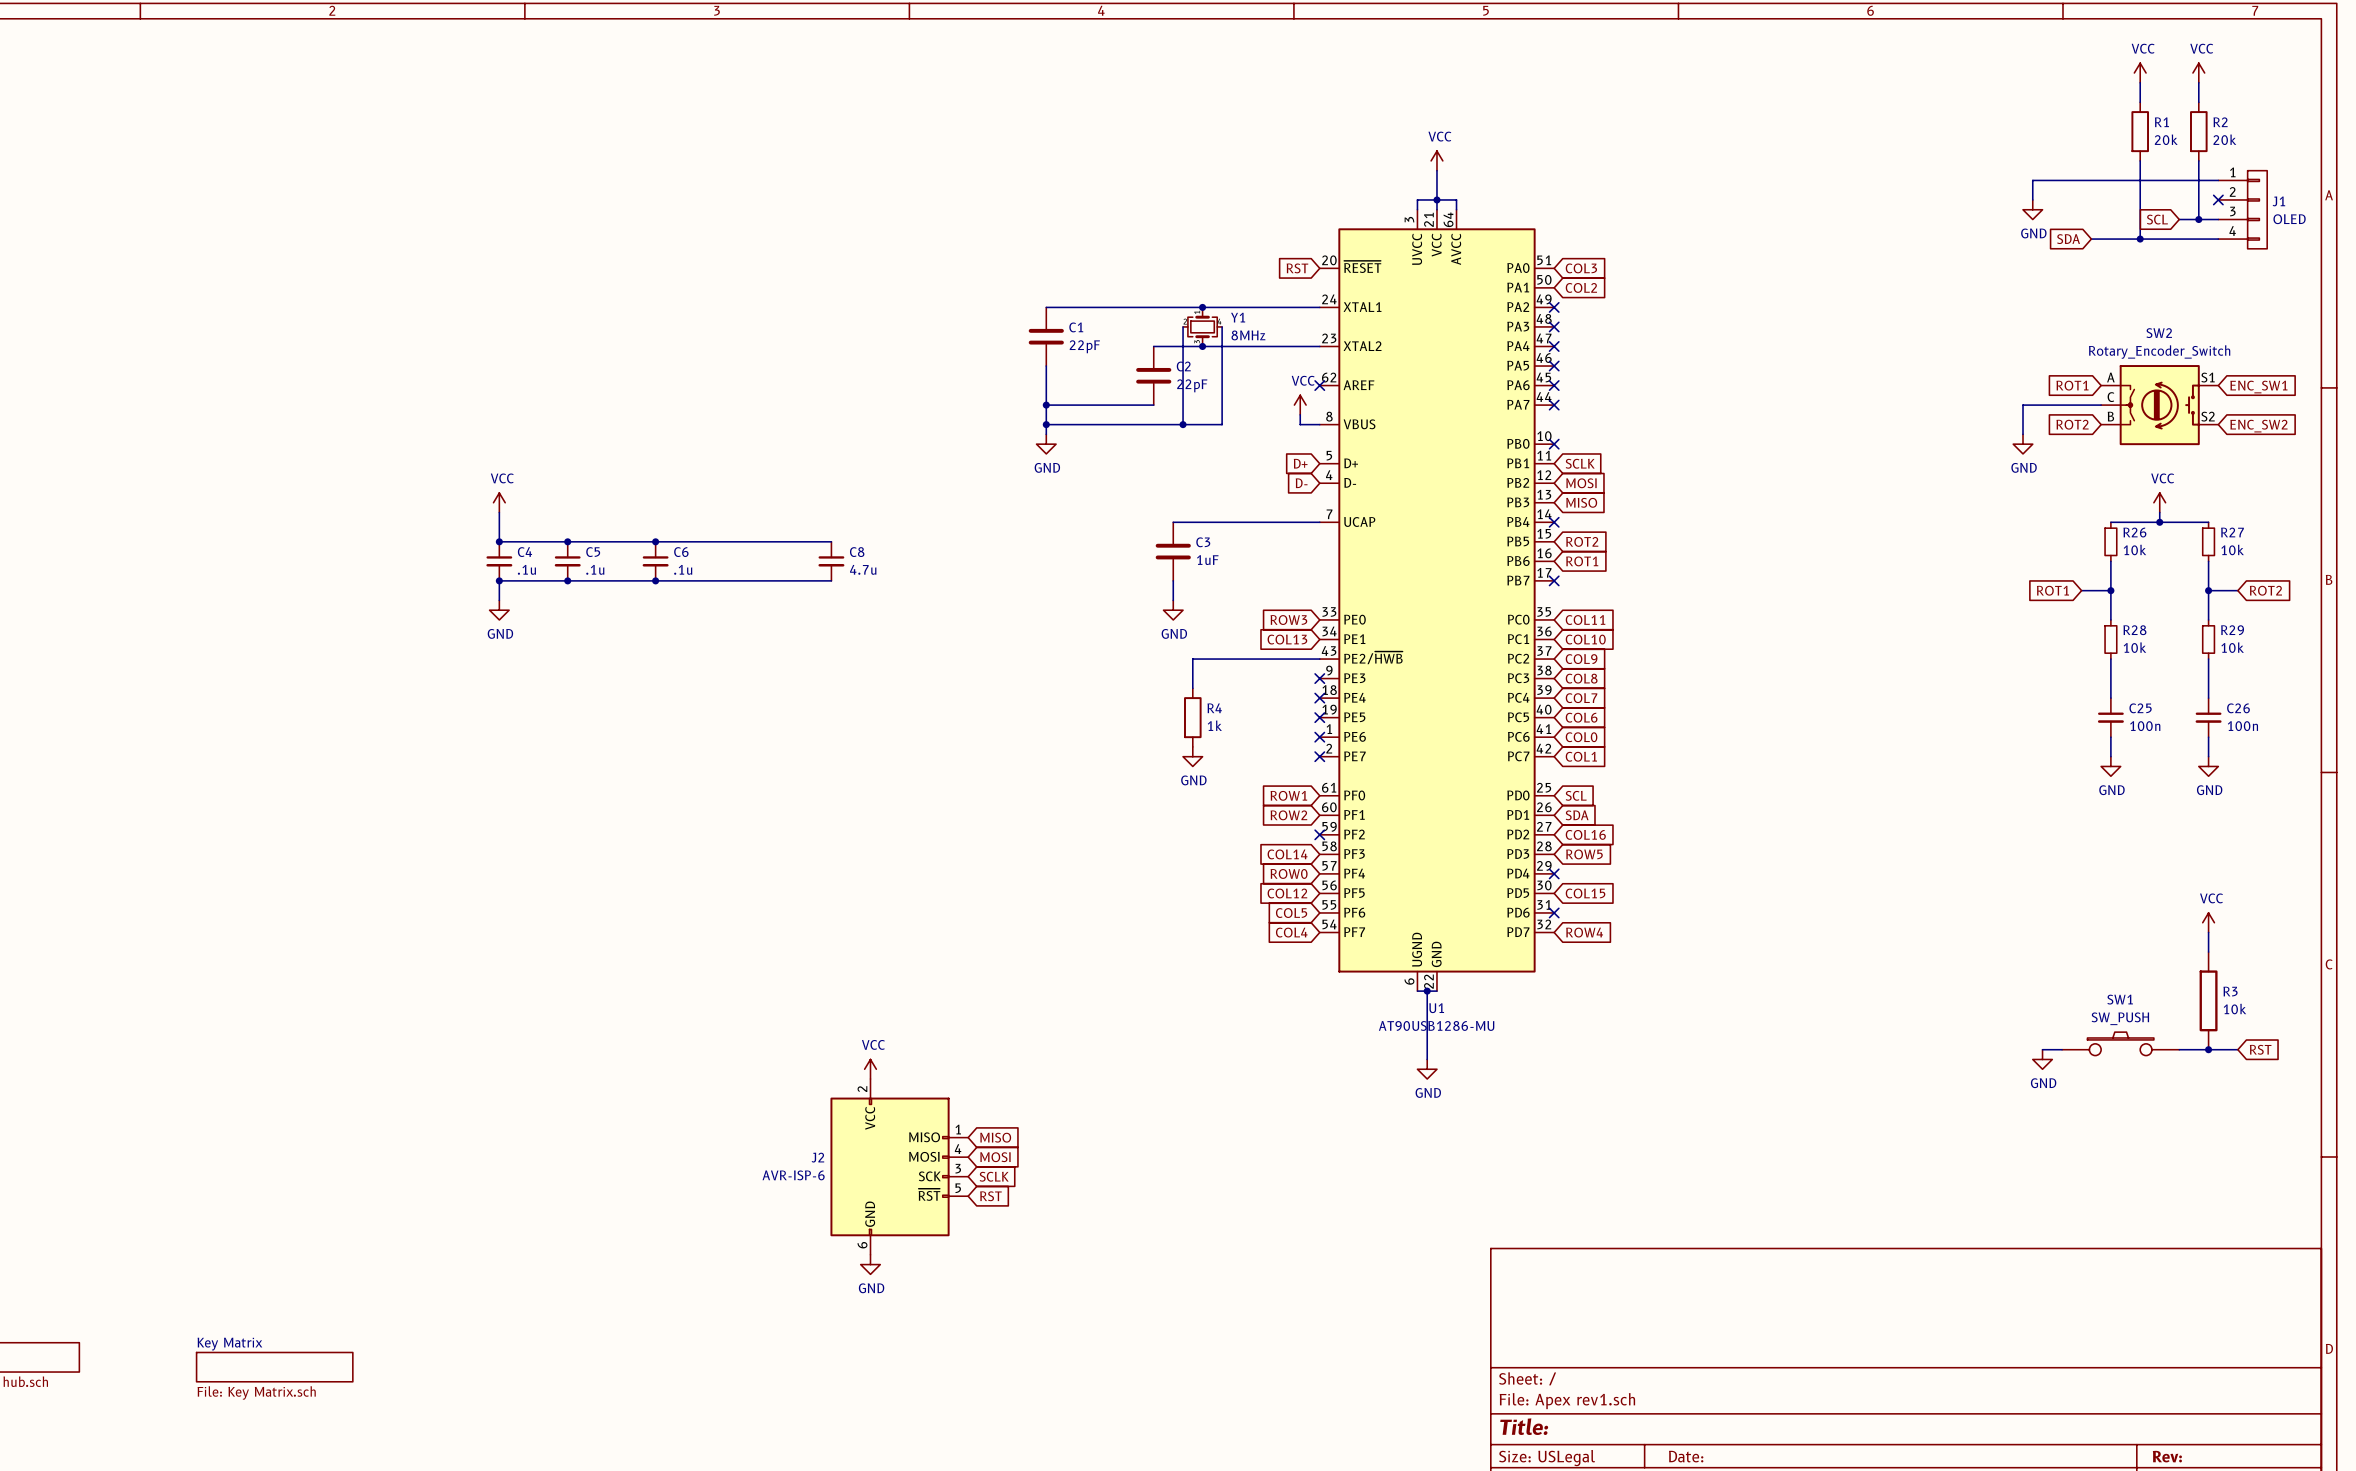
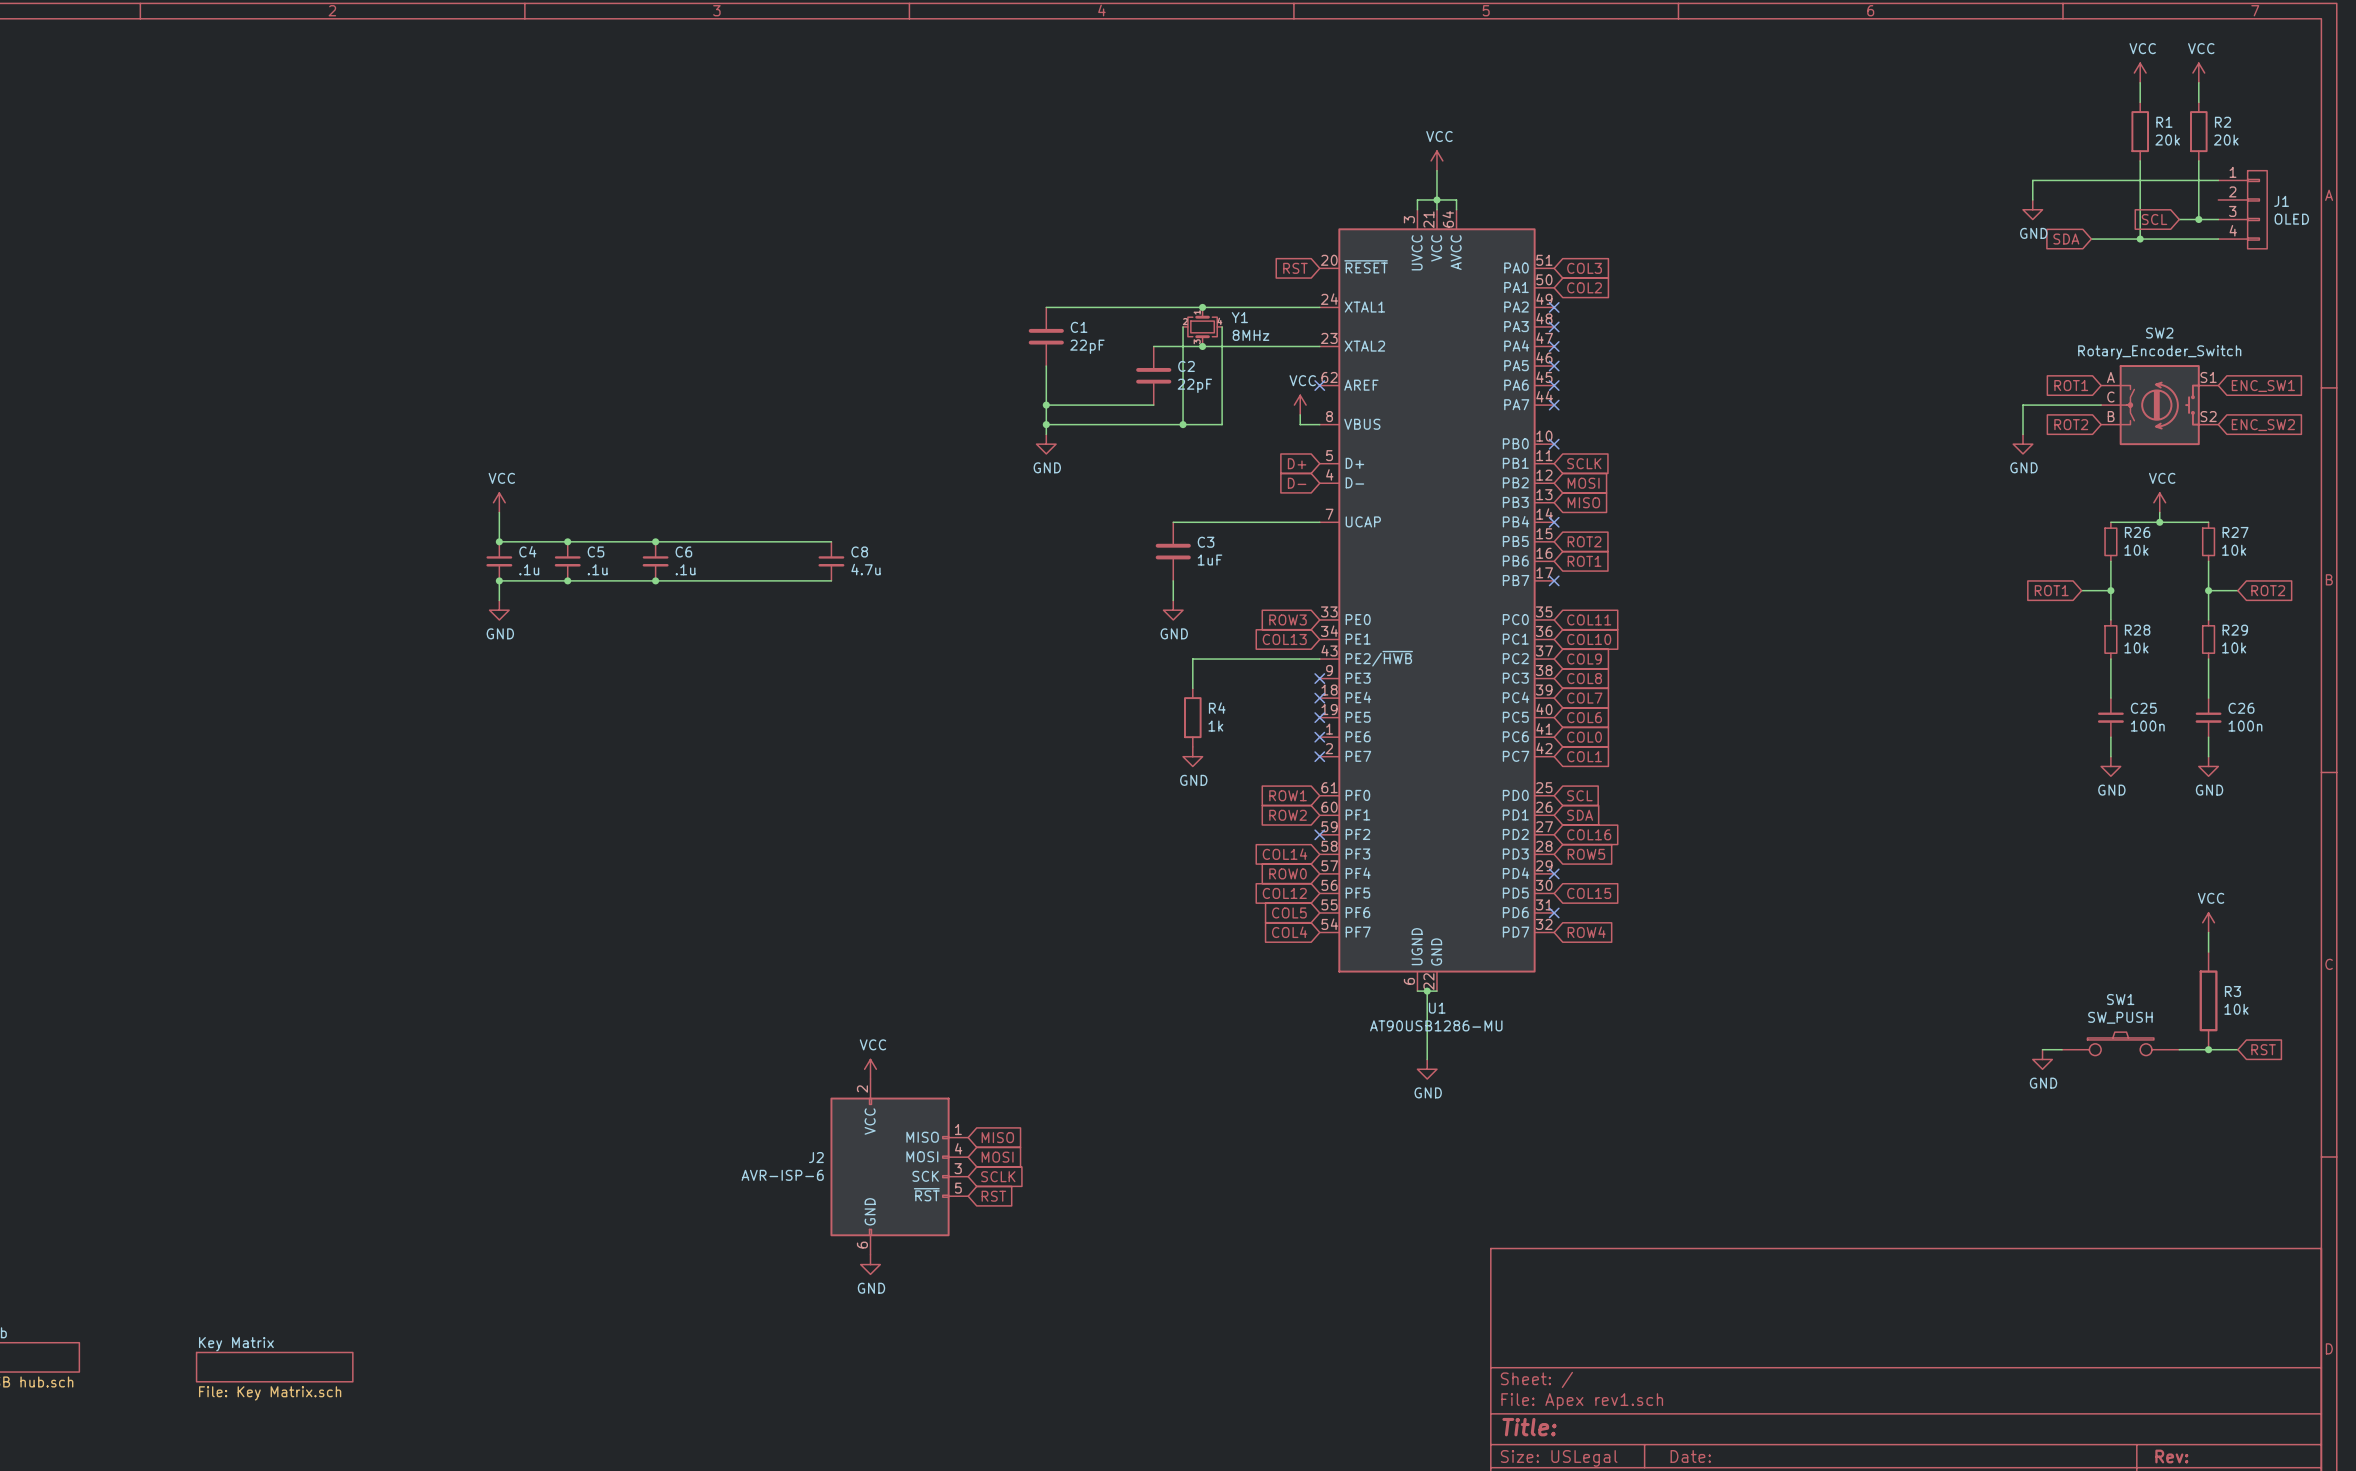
no-connect mark: (2218, 199) -> none

